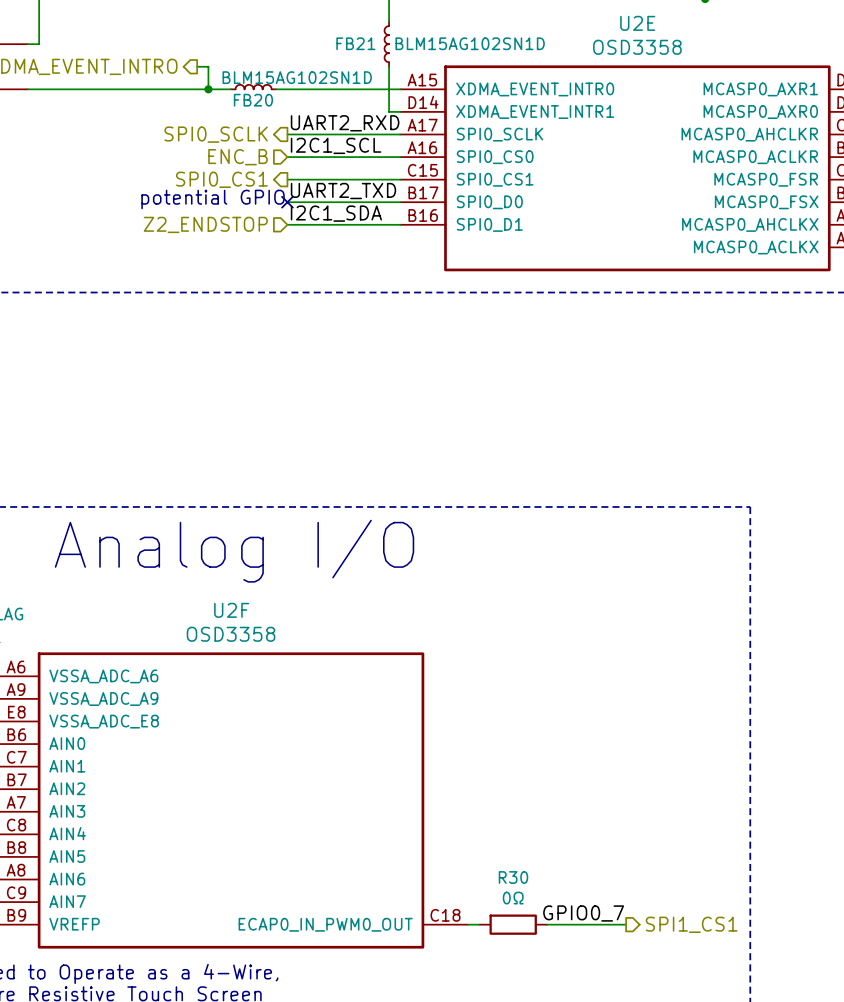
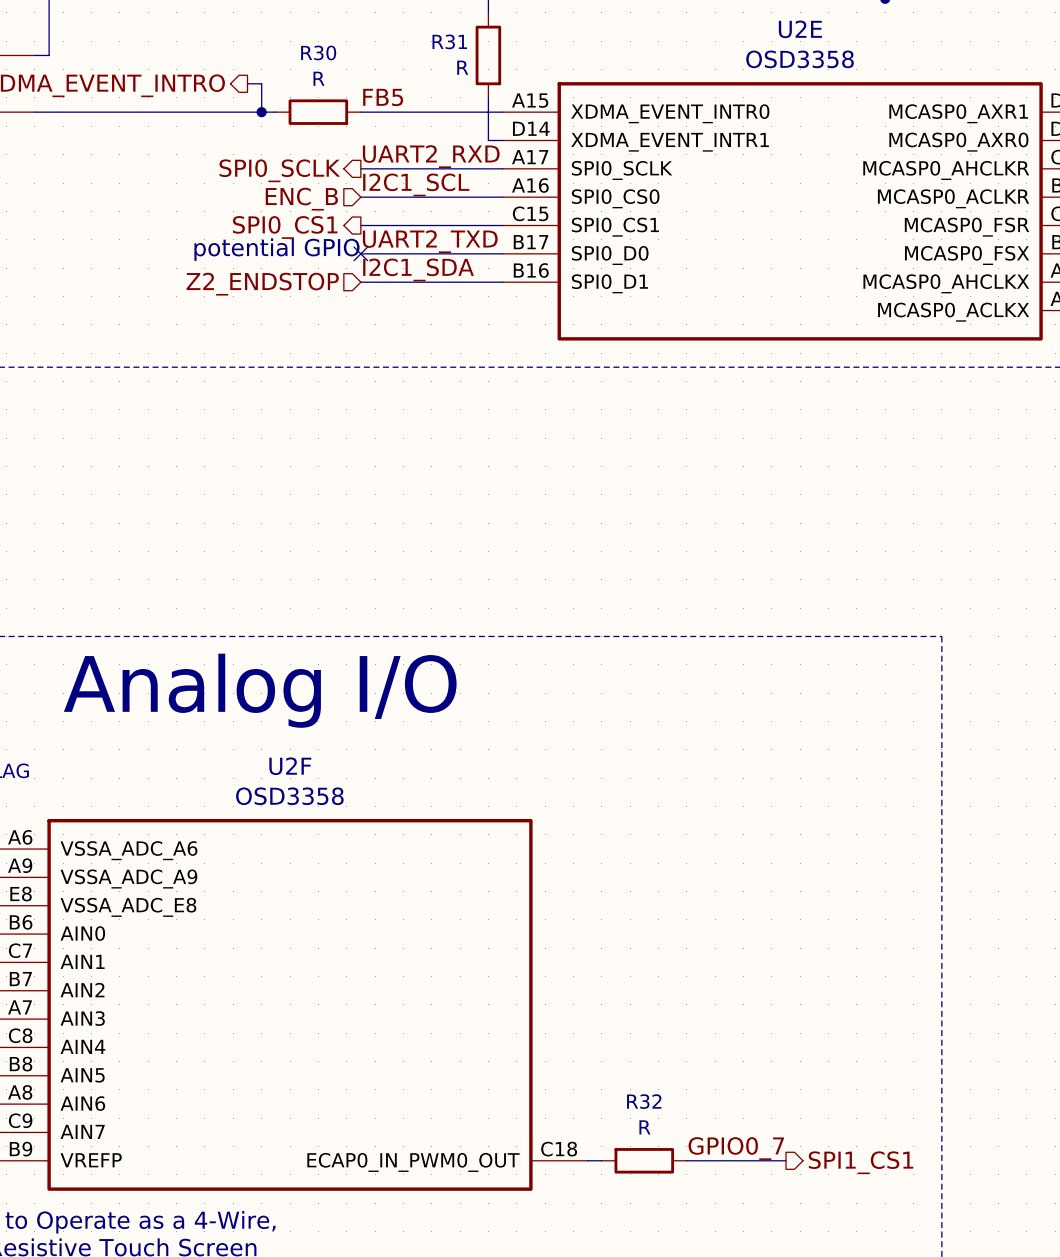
FB21: BLM15AG102SN1D (386, 44) -> none
R31: none -> R (488, 55)
label: none -> FB5 (383, 97)
FB20: BLM15AG102SN1D (253, 87) -> none
R30: none -> R (318, 112)
R30 name: R30 (513, 877) -> R32 (644, 1101)
R30 value: 0Ω (513, 898) -> R (644, 1127)

